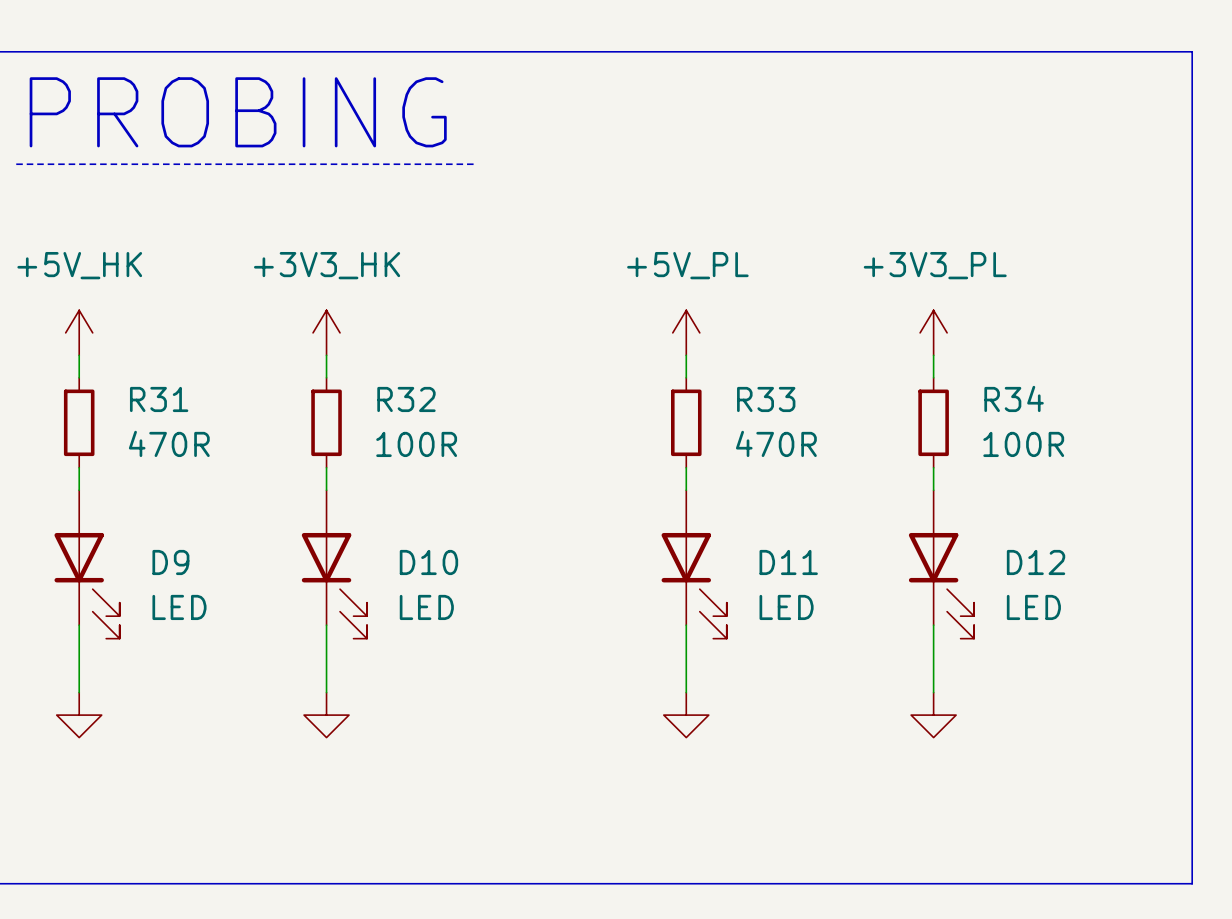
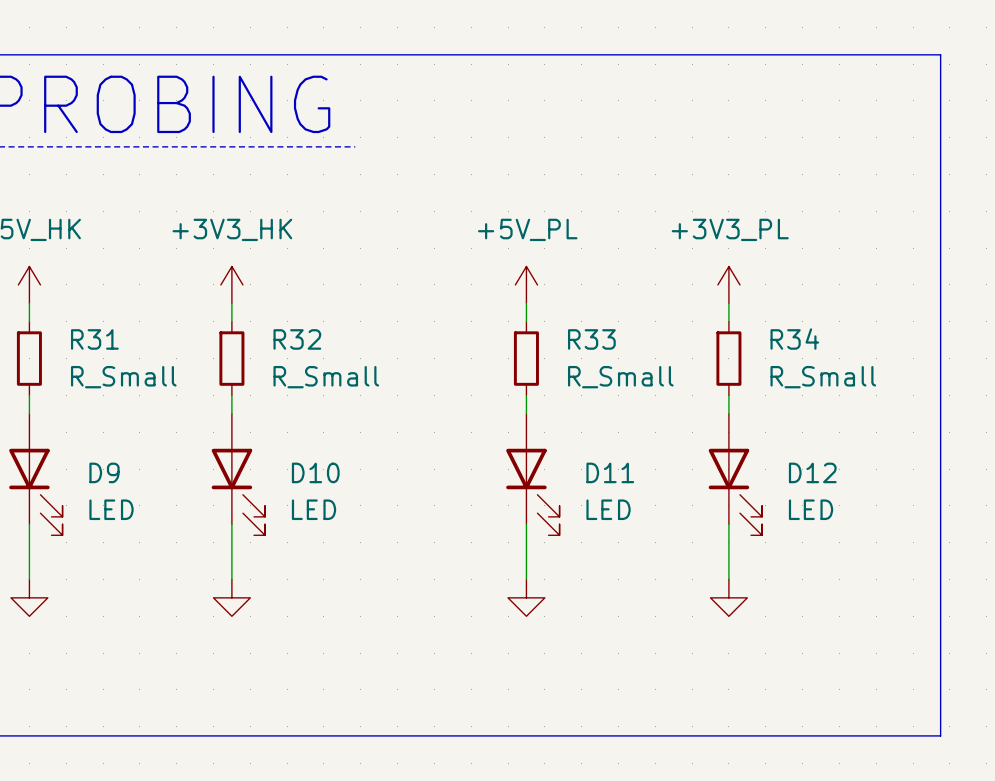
R31 value: 470R (169, 443) -> R_Small (123, 377)
R33 value: 470R (776, 443) -> R_Small (620, 377)
R32 value: 100R (416, 444) -> R_Small (326, 377)
R34 value: 100R (1023, 444) -> R_Small (823, 377)

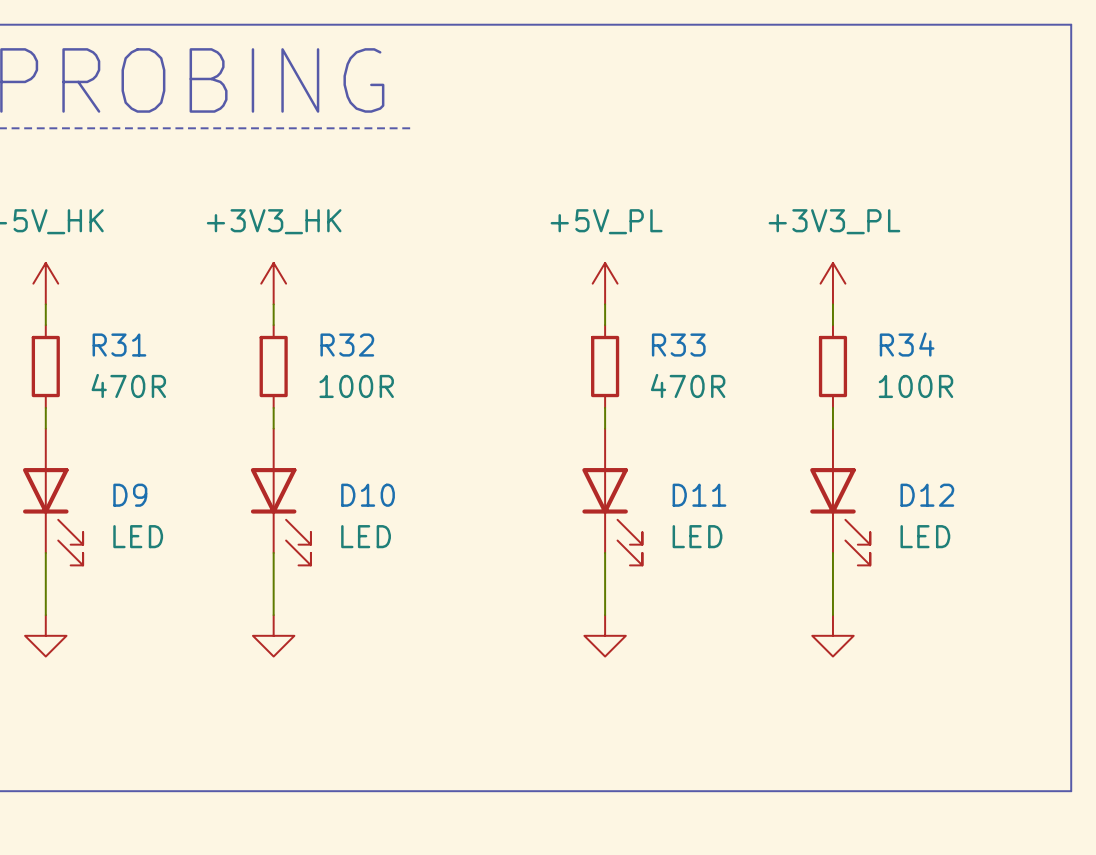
R31 value: R_Small (123, 377) -> 470R (128, 385)
R32 value: R_Small (326, 377) -> 100R (356, 386)
R33 value: R_Small (620, 377) -> 470R (688, 385)
R34 value: R_Small (823, 377) -> 100R (916, 386)

